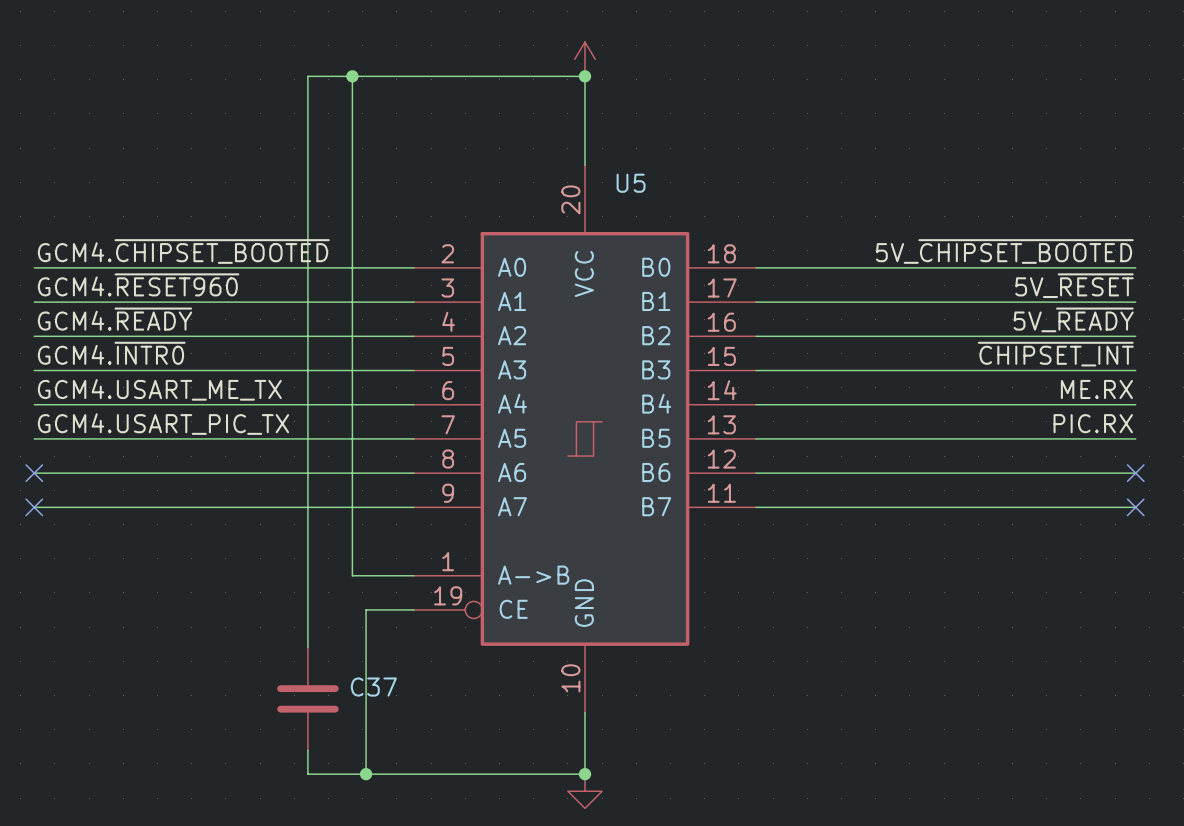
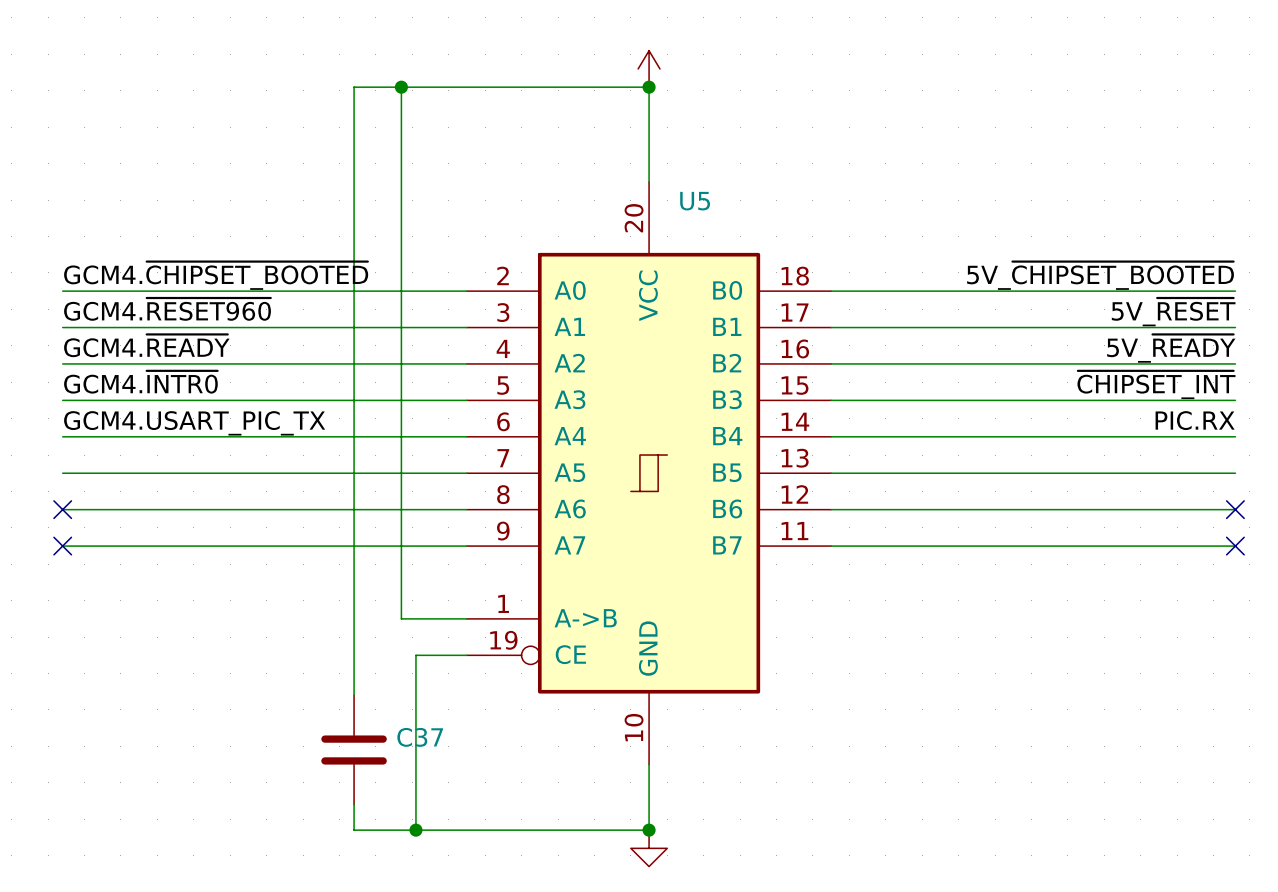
label: GCM4.USART_ME_TX (159, 389) -> GCM4.USART_PIC_TX (194, 423)
label: ME.RX (1096, 389) -> PIC.RX (1195, 420)
label: PIC.RX (1093, 423) -> none
label: GCM4.USART_PIC_TX (163, 424) -> none

